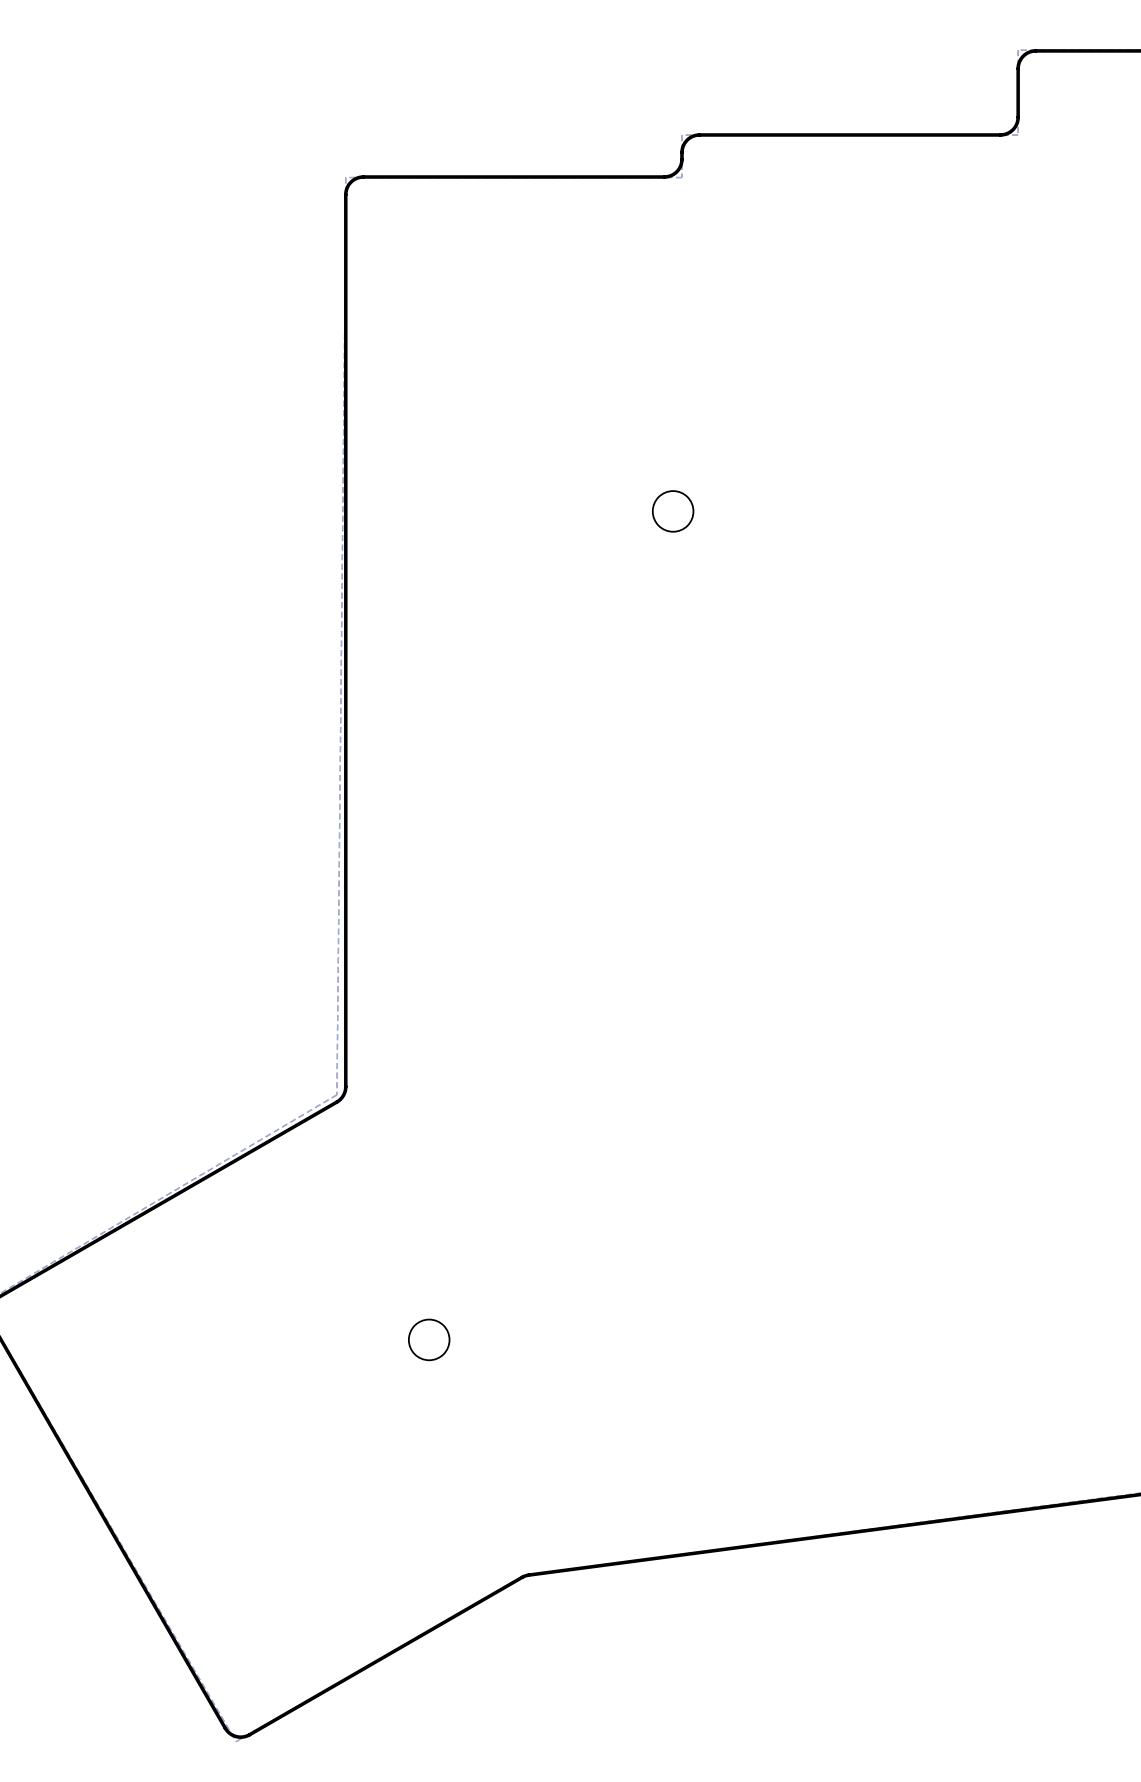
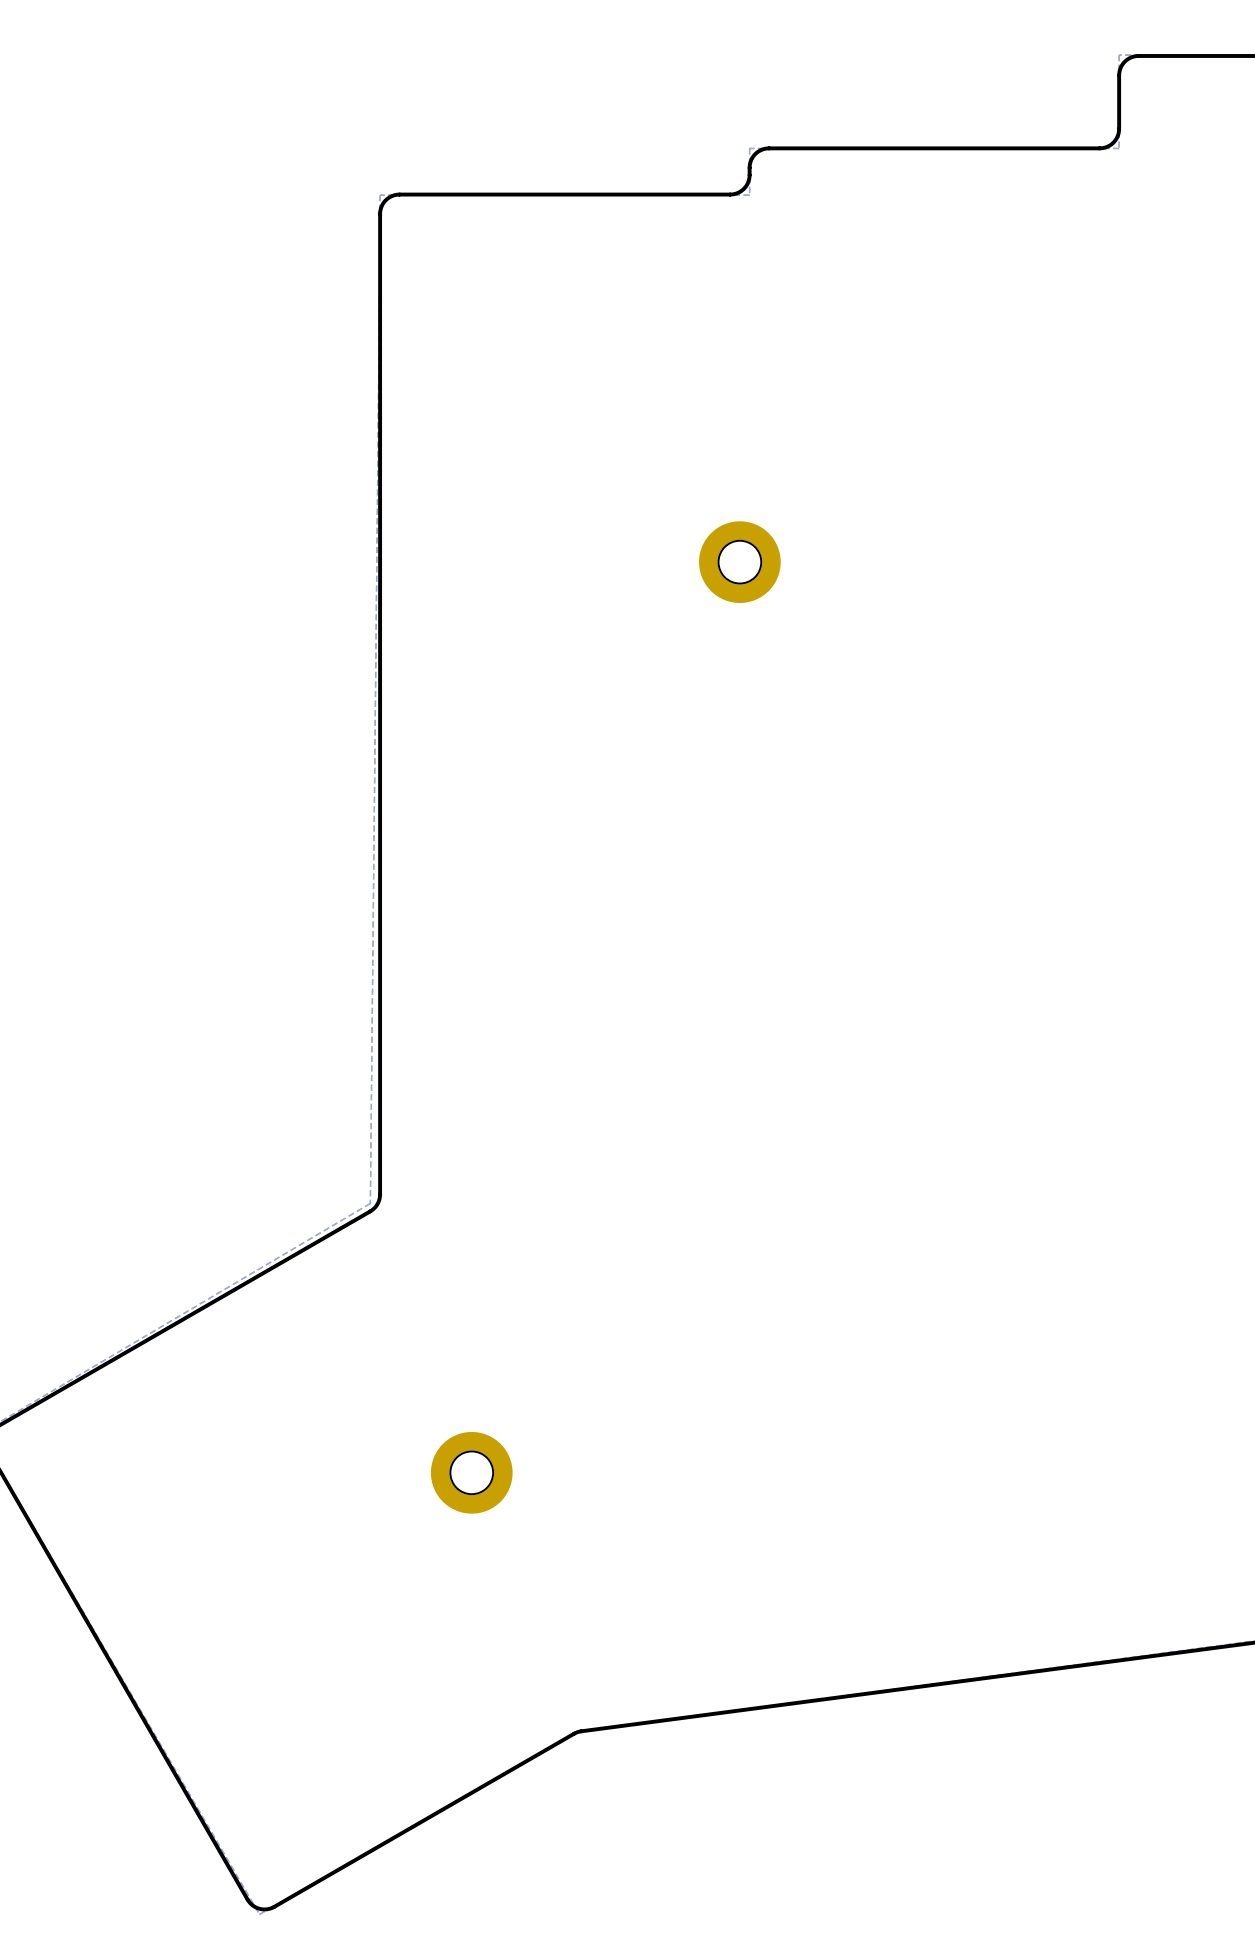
drawing: [651, 490, 695, 533] -> none
part: none -> (739, 562)
drawing: [407, 1318, 451, 1362] -> none
part: none -> (471, 1472)

